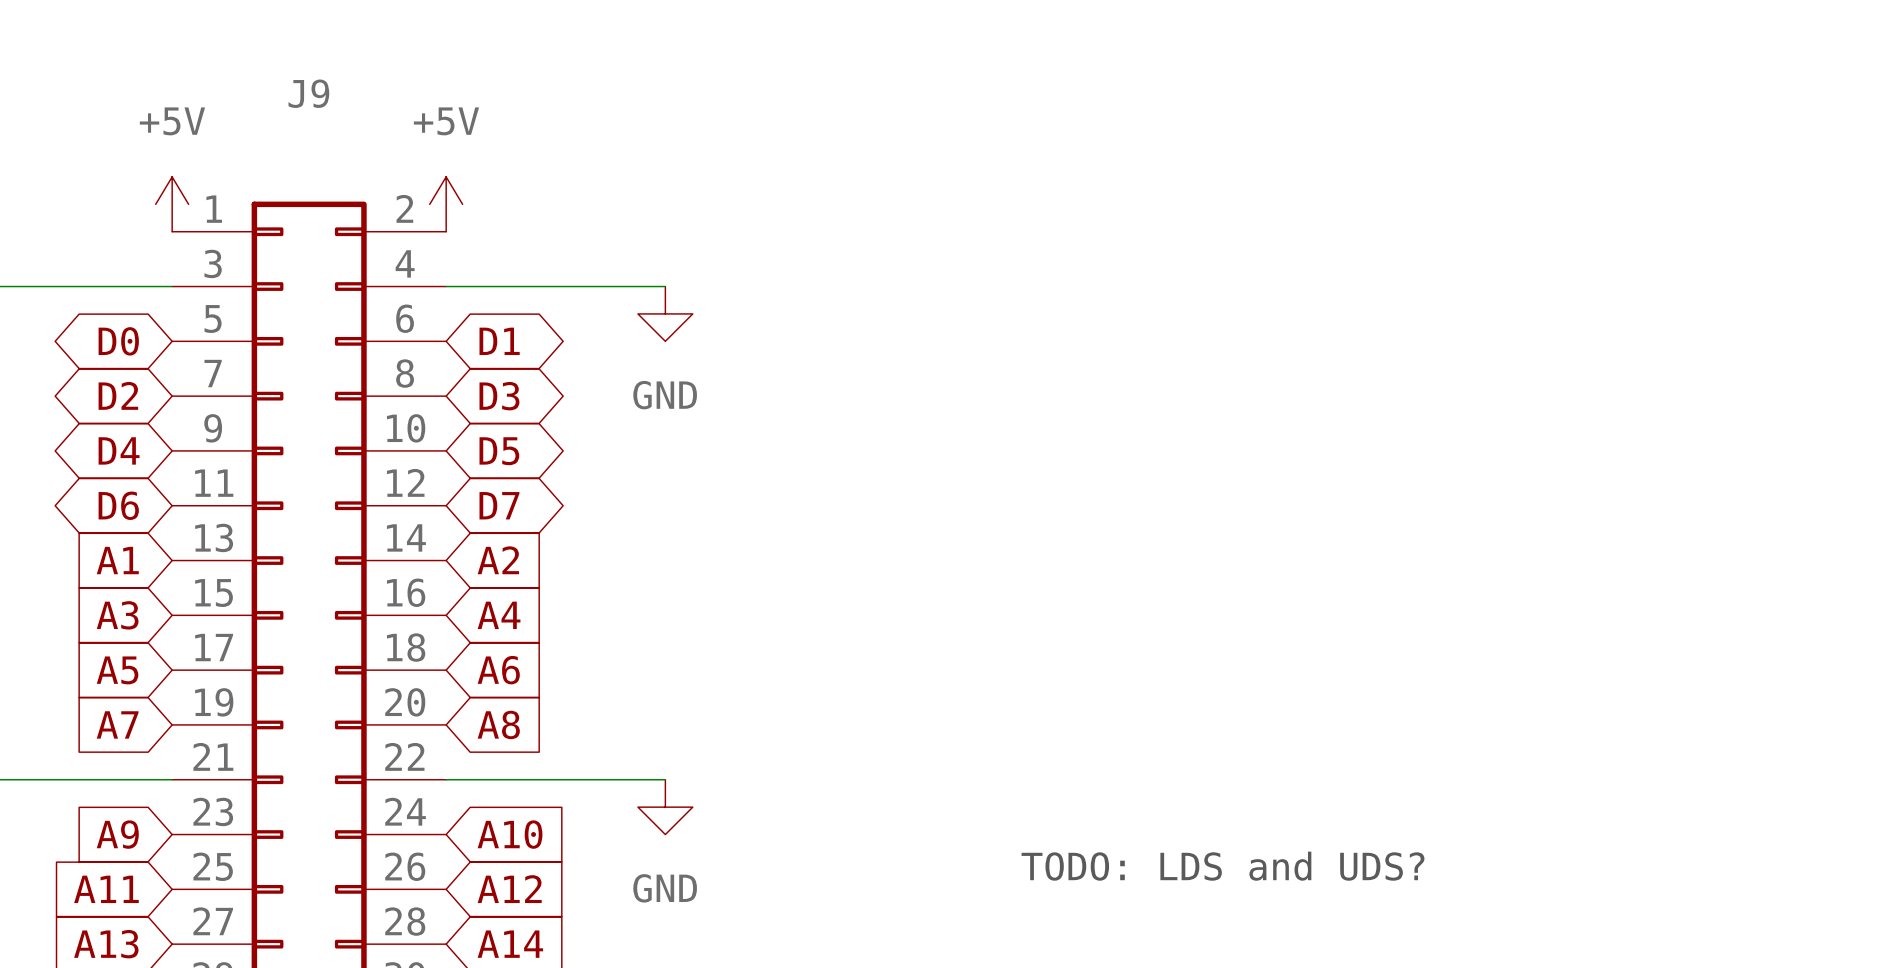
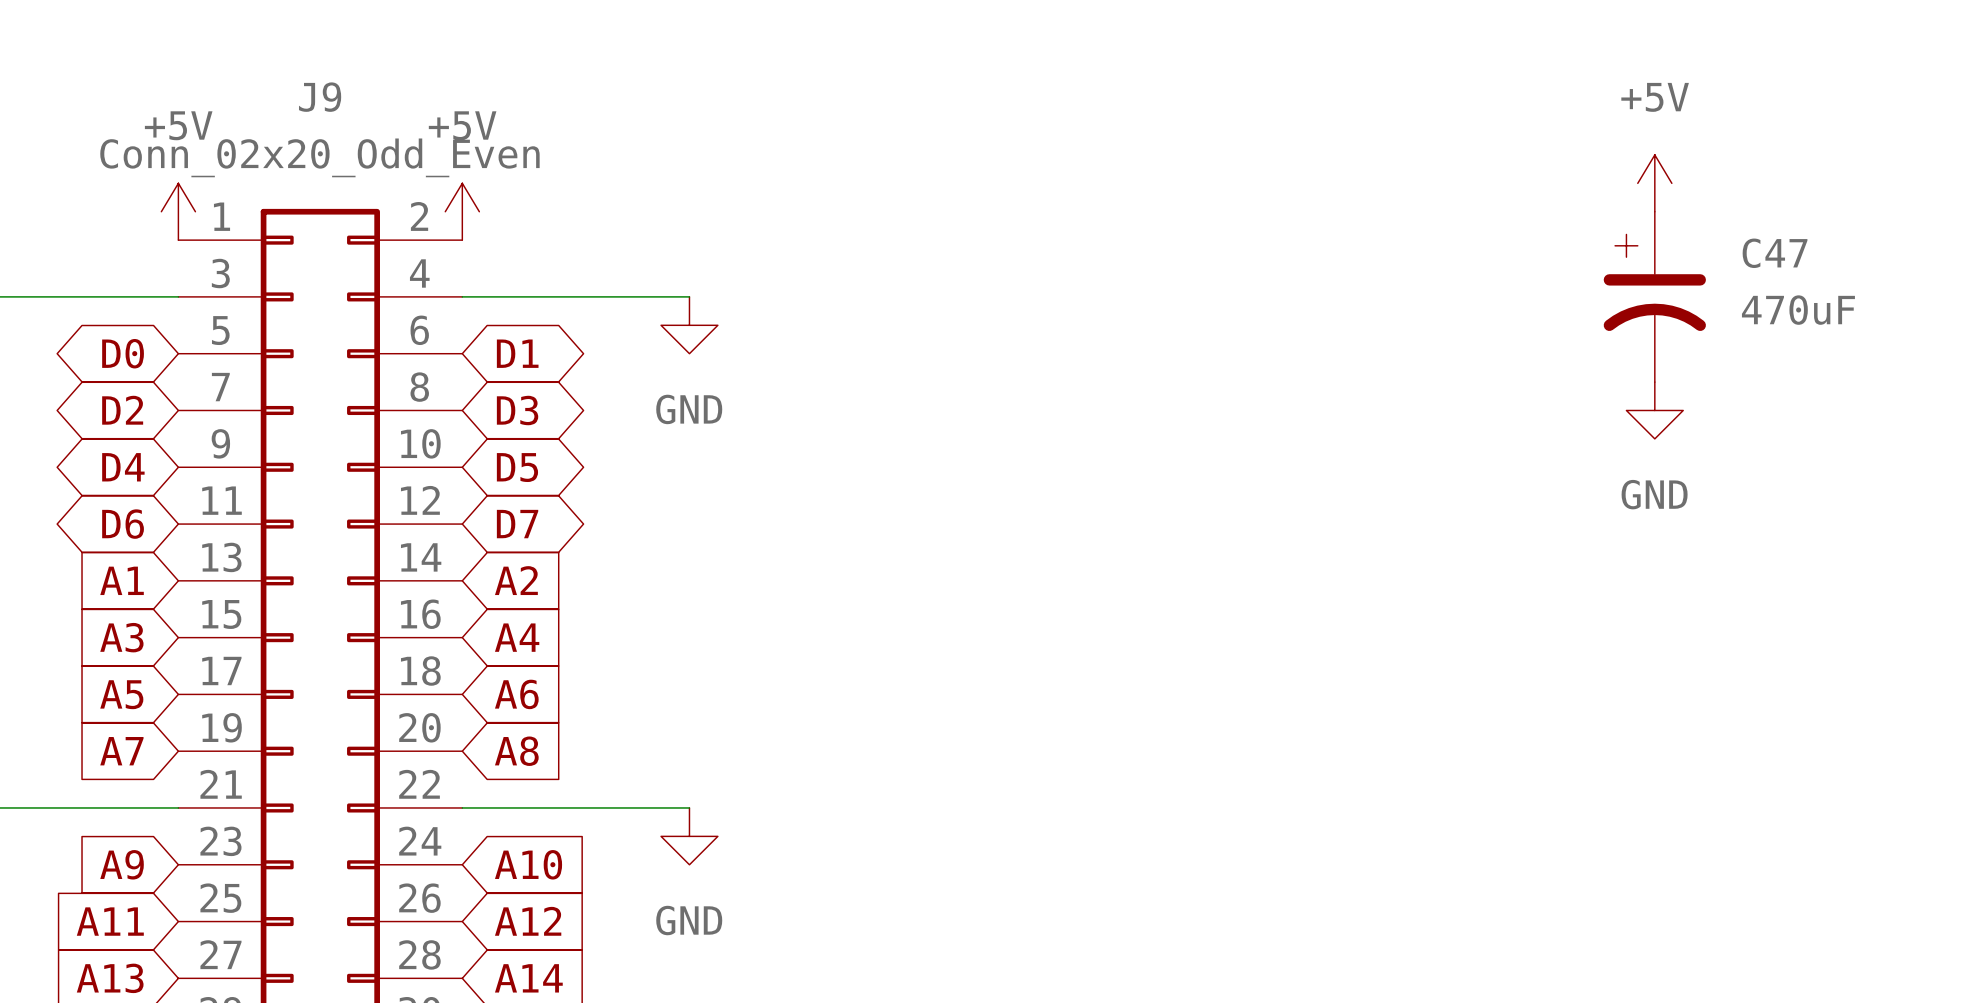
J9 value: none -> Conn_02x20_Odd_Even (319, 157)
power symbol: none -> +5V (1654, 183)
C47: none -> 470uF (1654, 296)
power symbol: none -> GND (1654, 410)
text: TODO: LDS and UDS? (1223, 866) -> none

